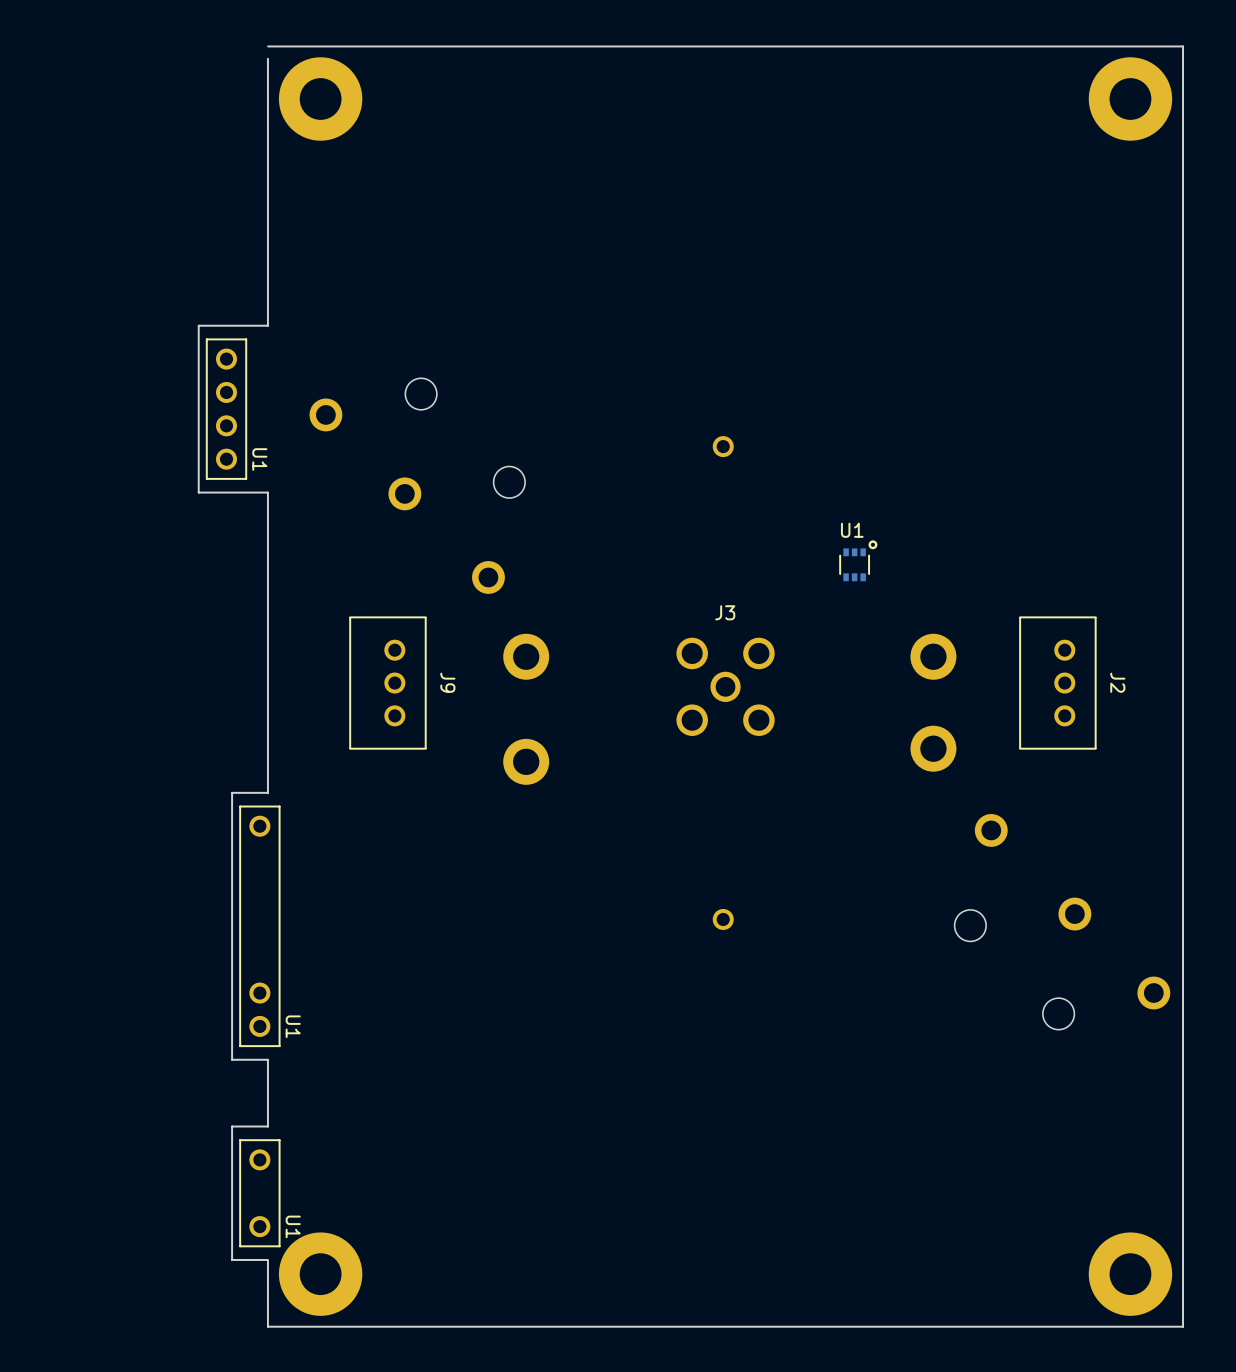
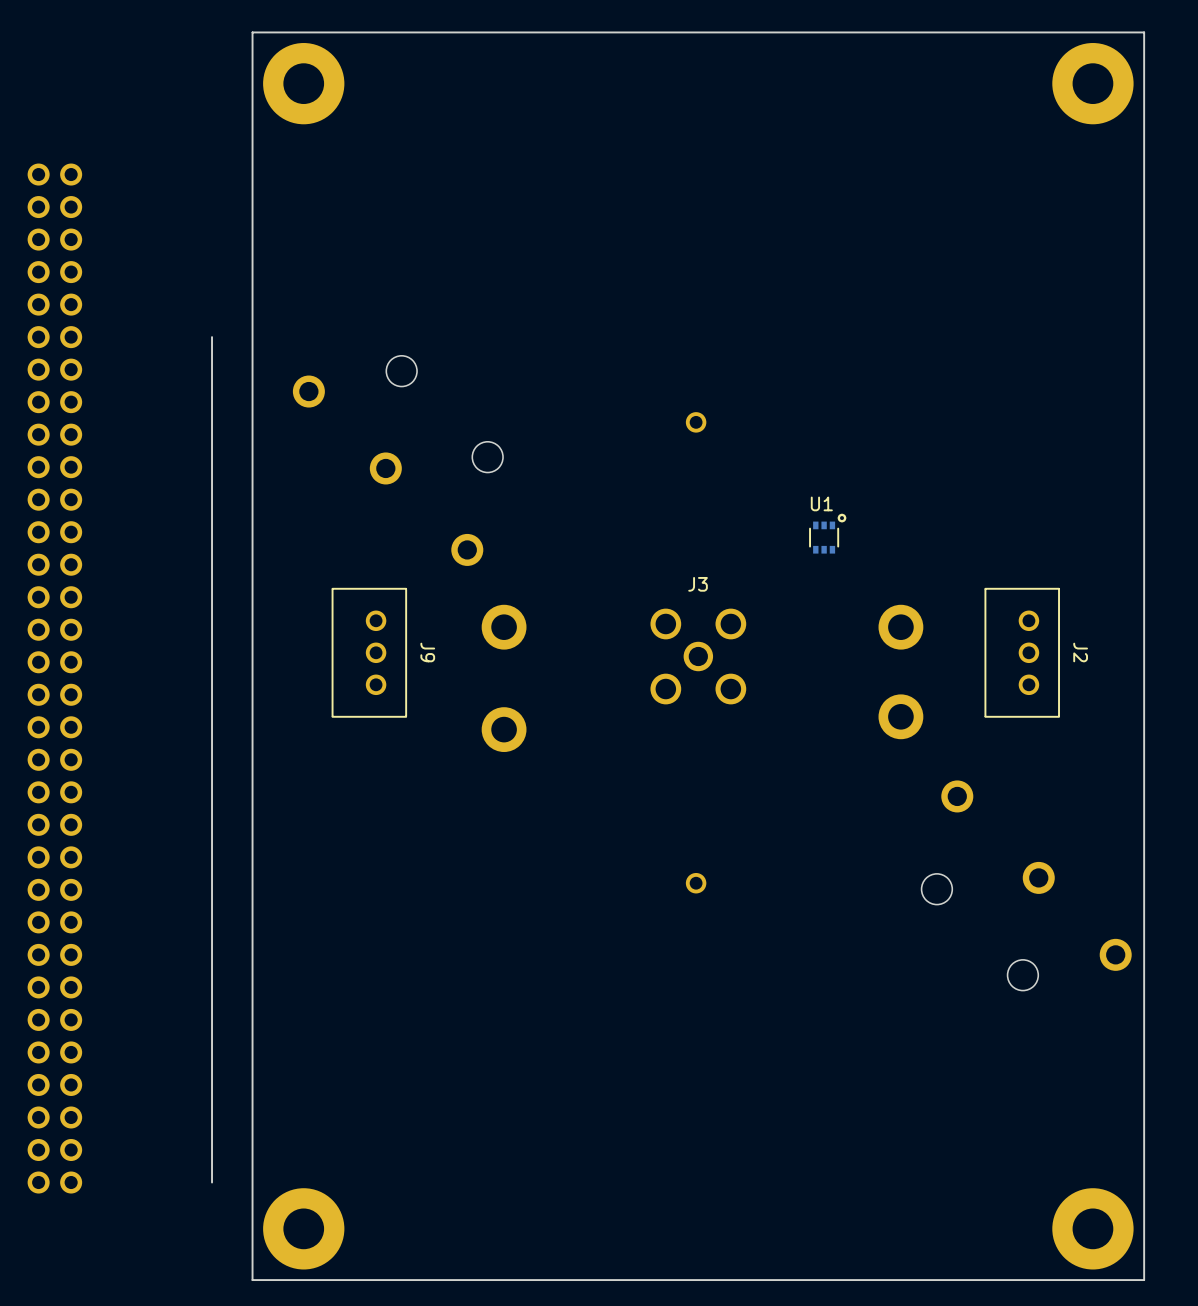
board edge: (267, 58) (267, 325) (198, 325) (198, 492) (267, 492) (267, 792) (232, 792) (232, 1059) (267, 1059) (267, 1126) (232, 1126) (232, 1259) (267, 1259) -> none
board edge: none -> (212, 337) (212, 1182)
U1: (226, 409) -> none
part: none -> (54, 678)
U1: (259, 926) -> none
U1: (259, 1193) -> none
board edge: (267, 1261) (267, 1326) -> (252, 32) (252, 1280)

